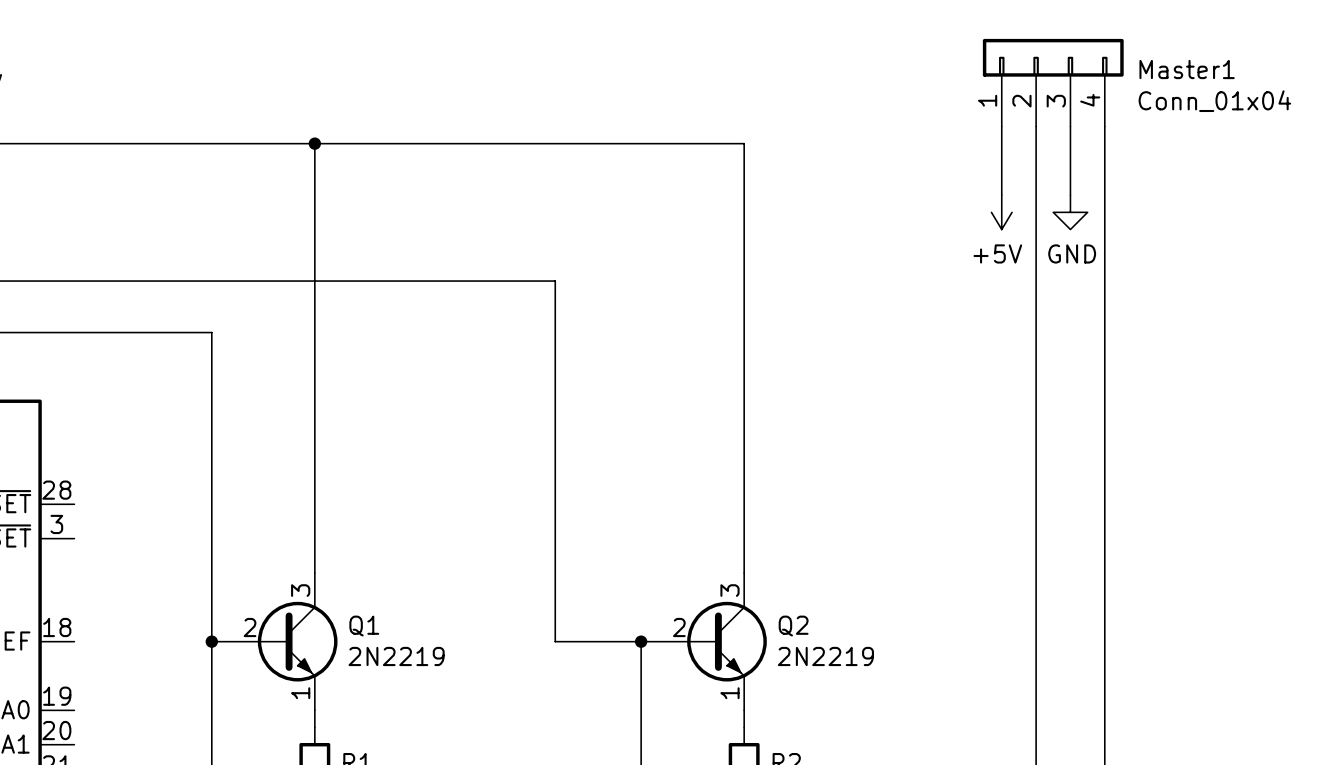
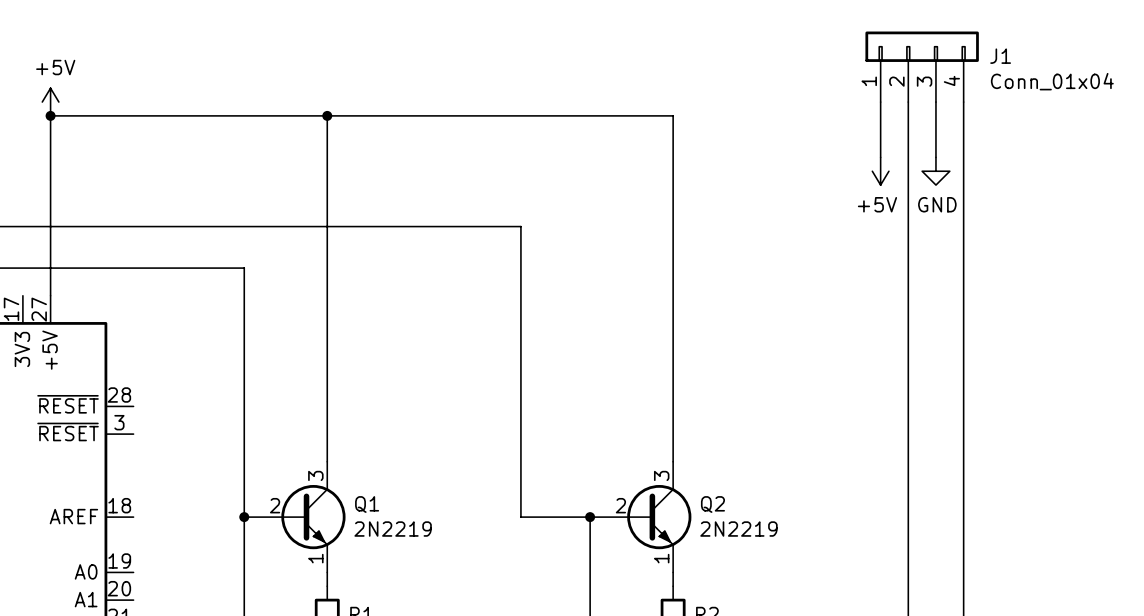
Master1 name: Master1 (1187, 69) -> J1 (1000, 56)

